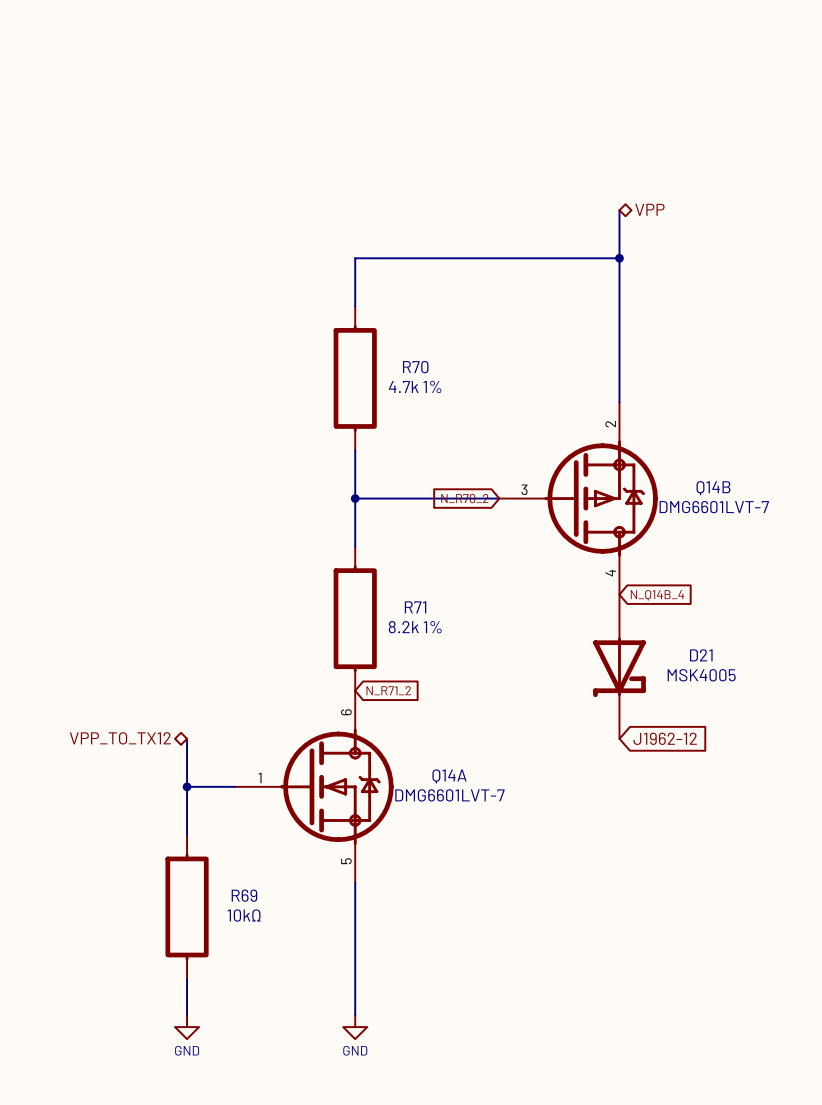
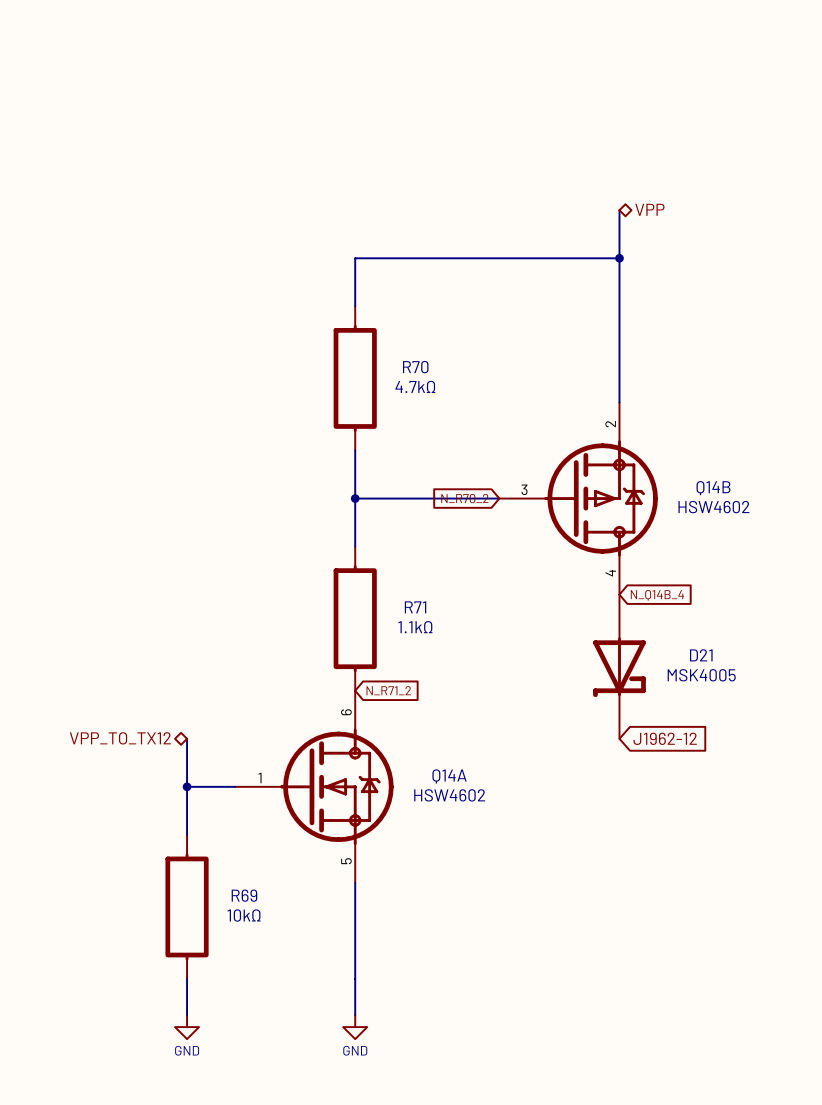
R70 value: 4.7k 1% (415, 386) -> 4.7kΩ (415, 386)
Q14B value: DMG6601LVT-7 (714, 507) -> HSW4602 (713, 507)
R71 value: 8.2k 1% (415, 627) -> 1.1kΩ (415, 627)
Q14A value: DMG6601LVT-7 (449, 795) -> HSW4602 (449, 795)

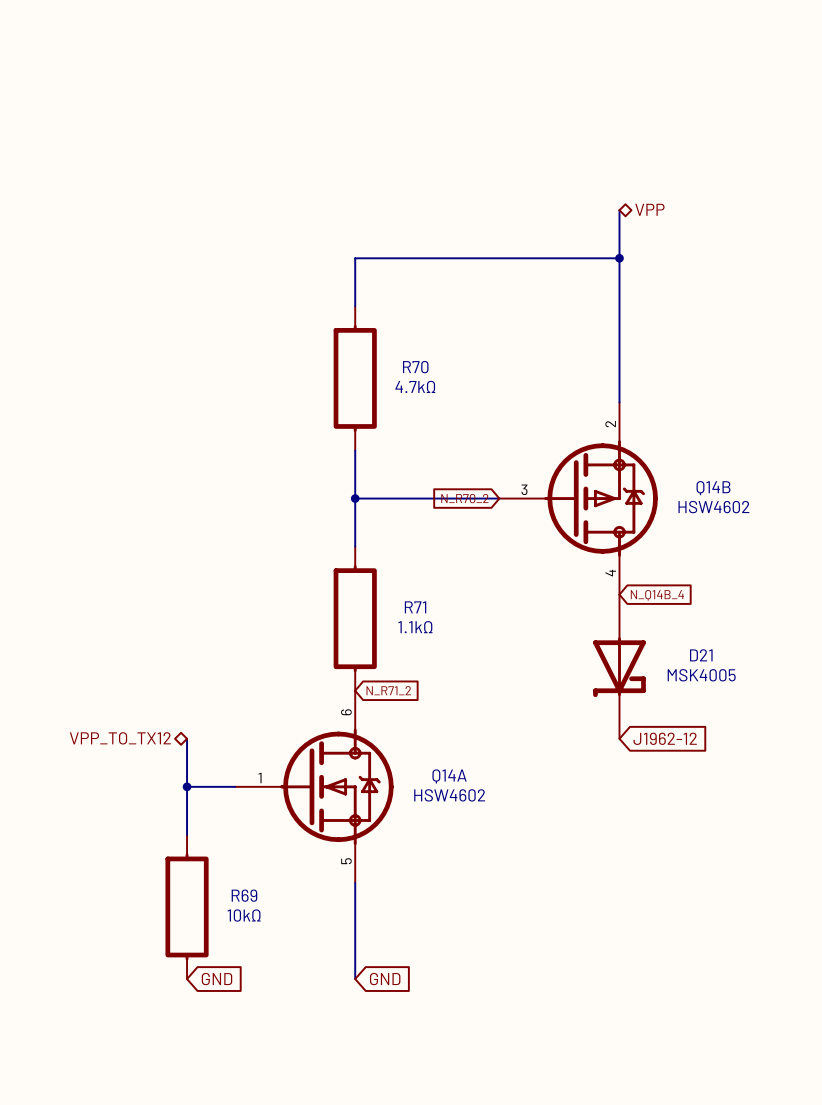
wire: (187, 979) (187, 1015) -> none
global label: none -> GND (217, 979)
wire: (355, 979) (355, 1015) -> none
global label: none -> GND (385, 979)
power symbol: GND (187, 1027) -> none
power symbol: GND (355, 1027) -> none

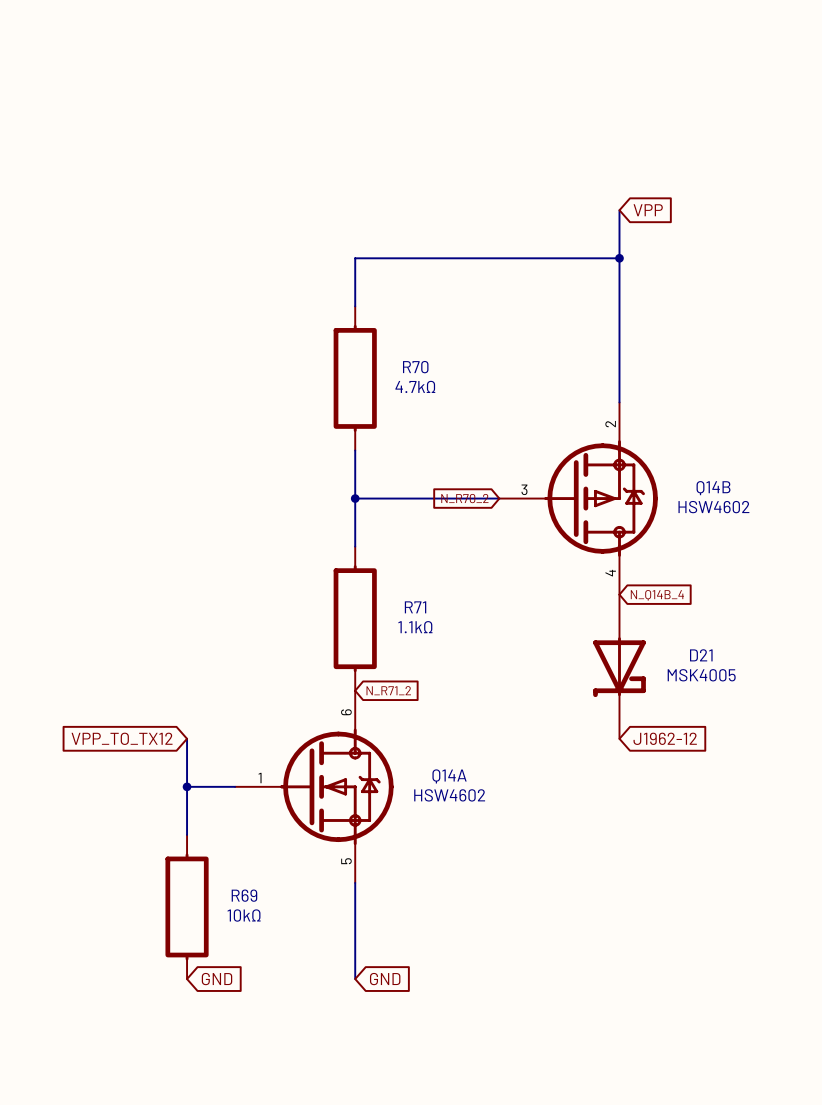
hierarchical label: VPP (649, 209) -> none
global label: none -> VPP (648, 210)
hierarchical label: VPP_TO_TX12 (120, 738) -> none
global label: none -> VPP_TO_TX12 (122, 738)

